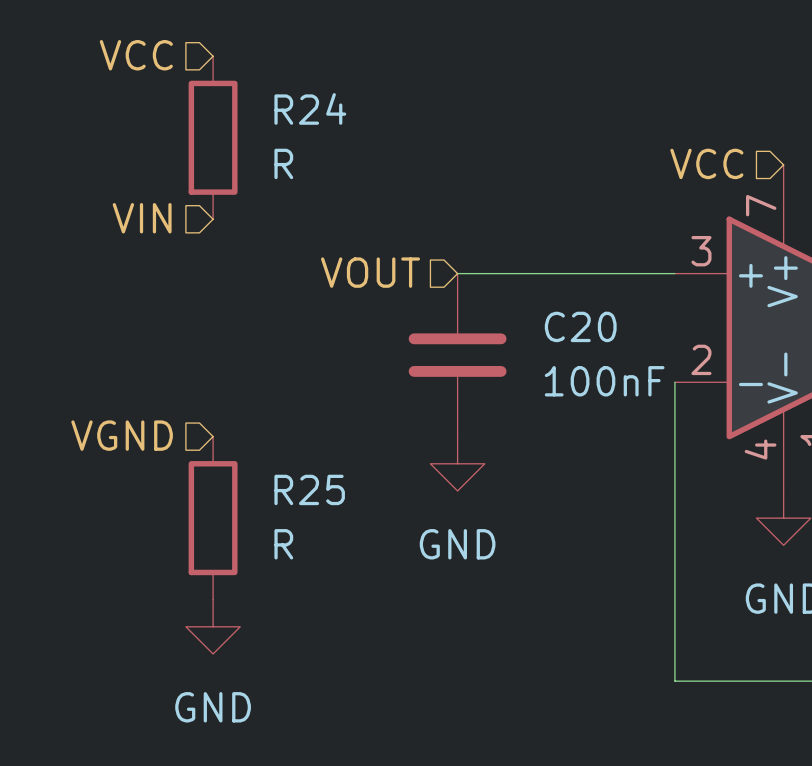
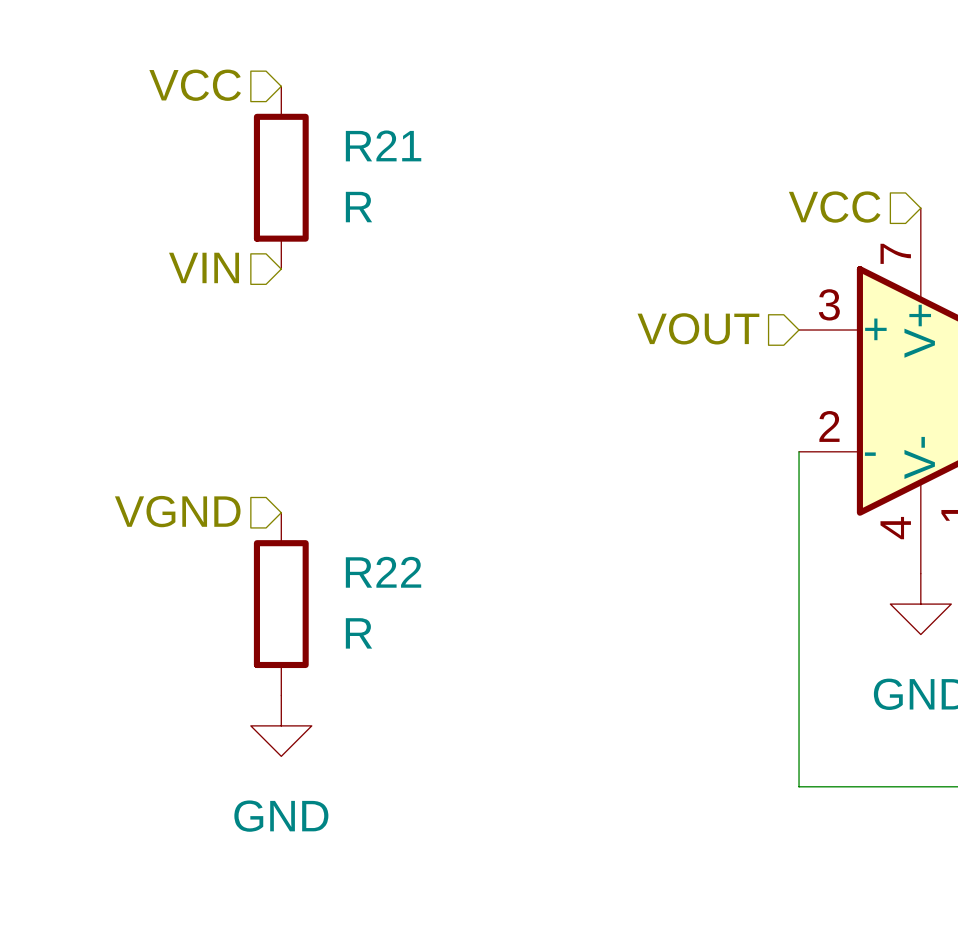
R24 name: R24 (310, 108) -> R21 (383, 145)
hierarchical label position: VOUT (370, 272) -> VOUT (698, 328)
wire: (457, 273) (674, 273) -> none
C20: 100nF (457, 355) -> none
power symbol: GND (457, 463) -> none
R25 name: R25 (309, 489) -> R22 (383, 572)

